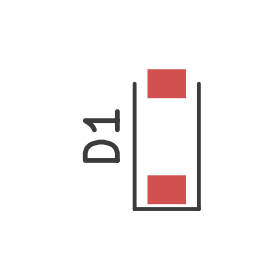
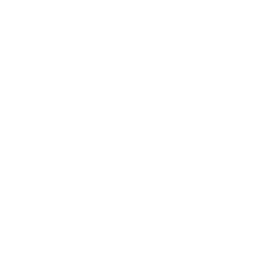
D1: (166, 140) -> none

